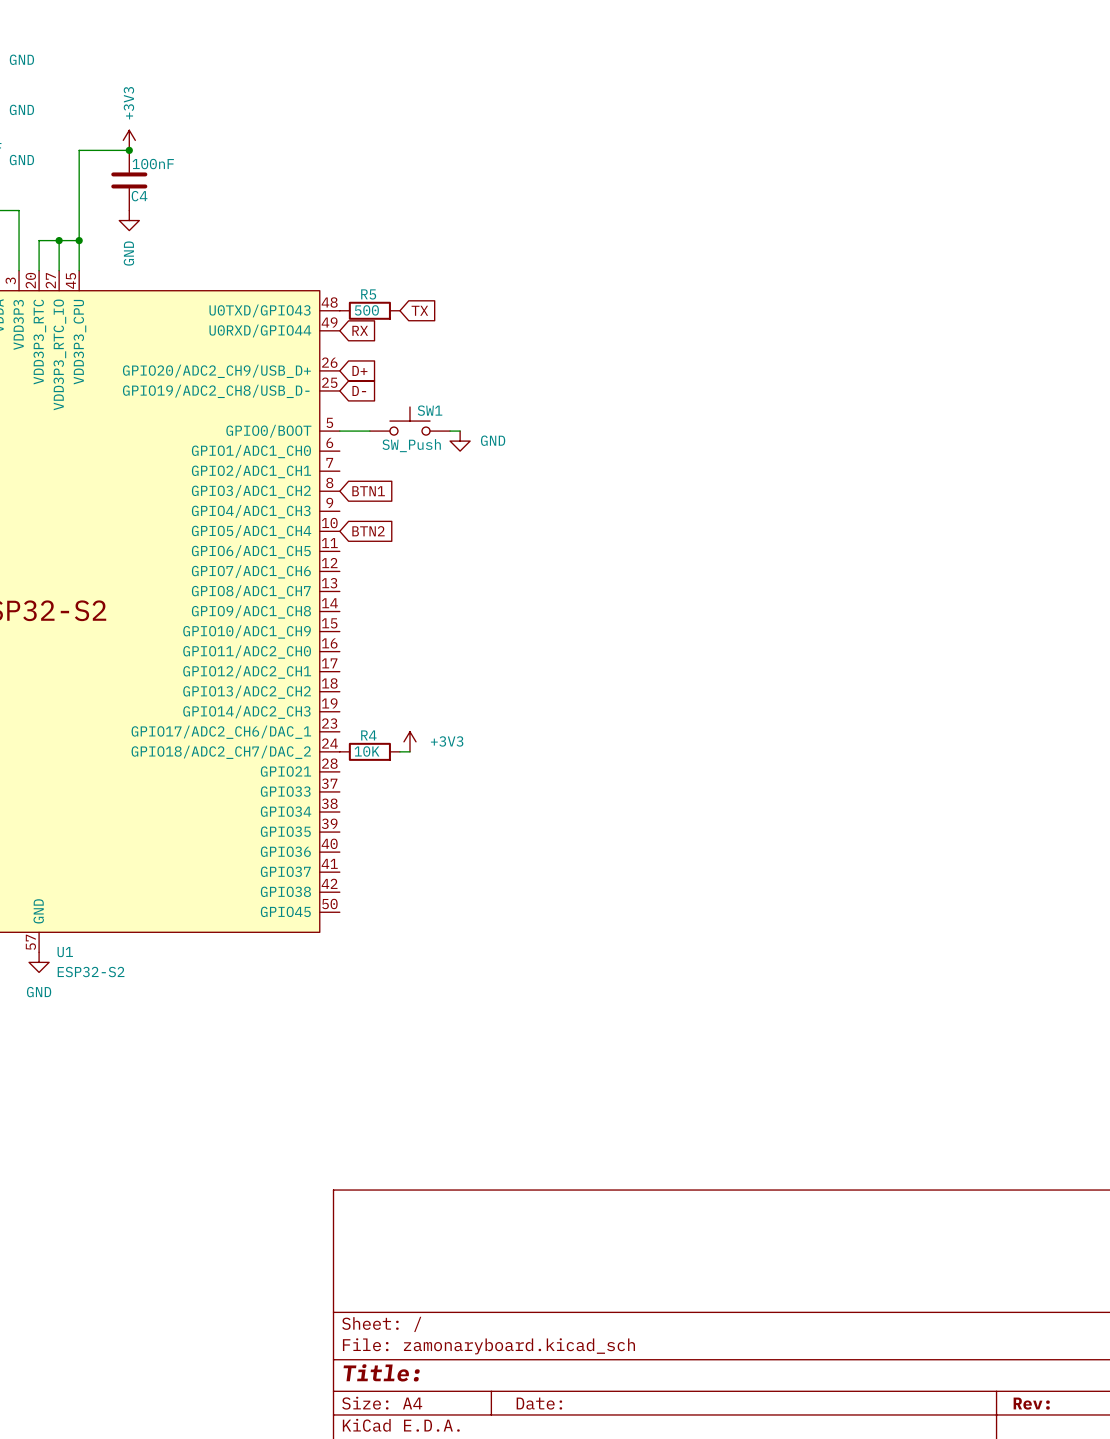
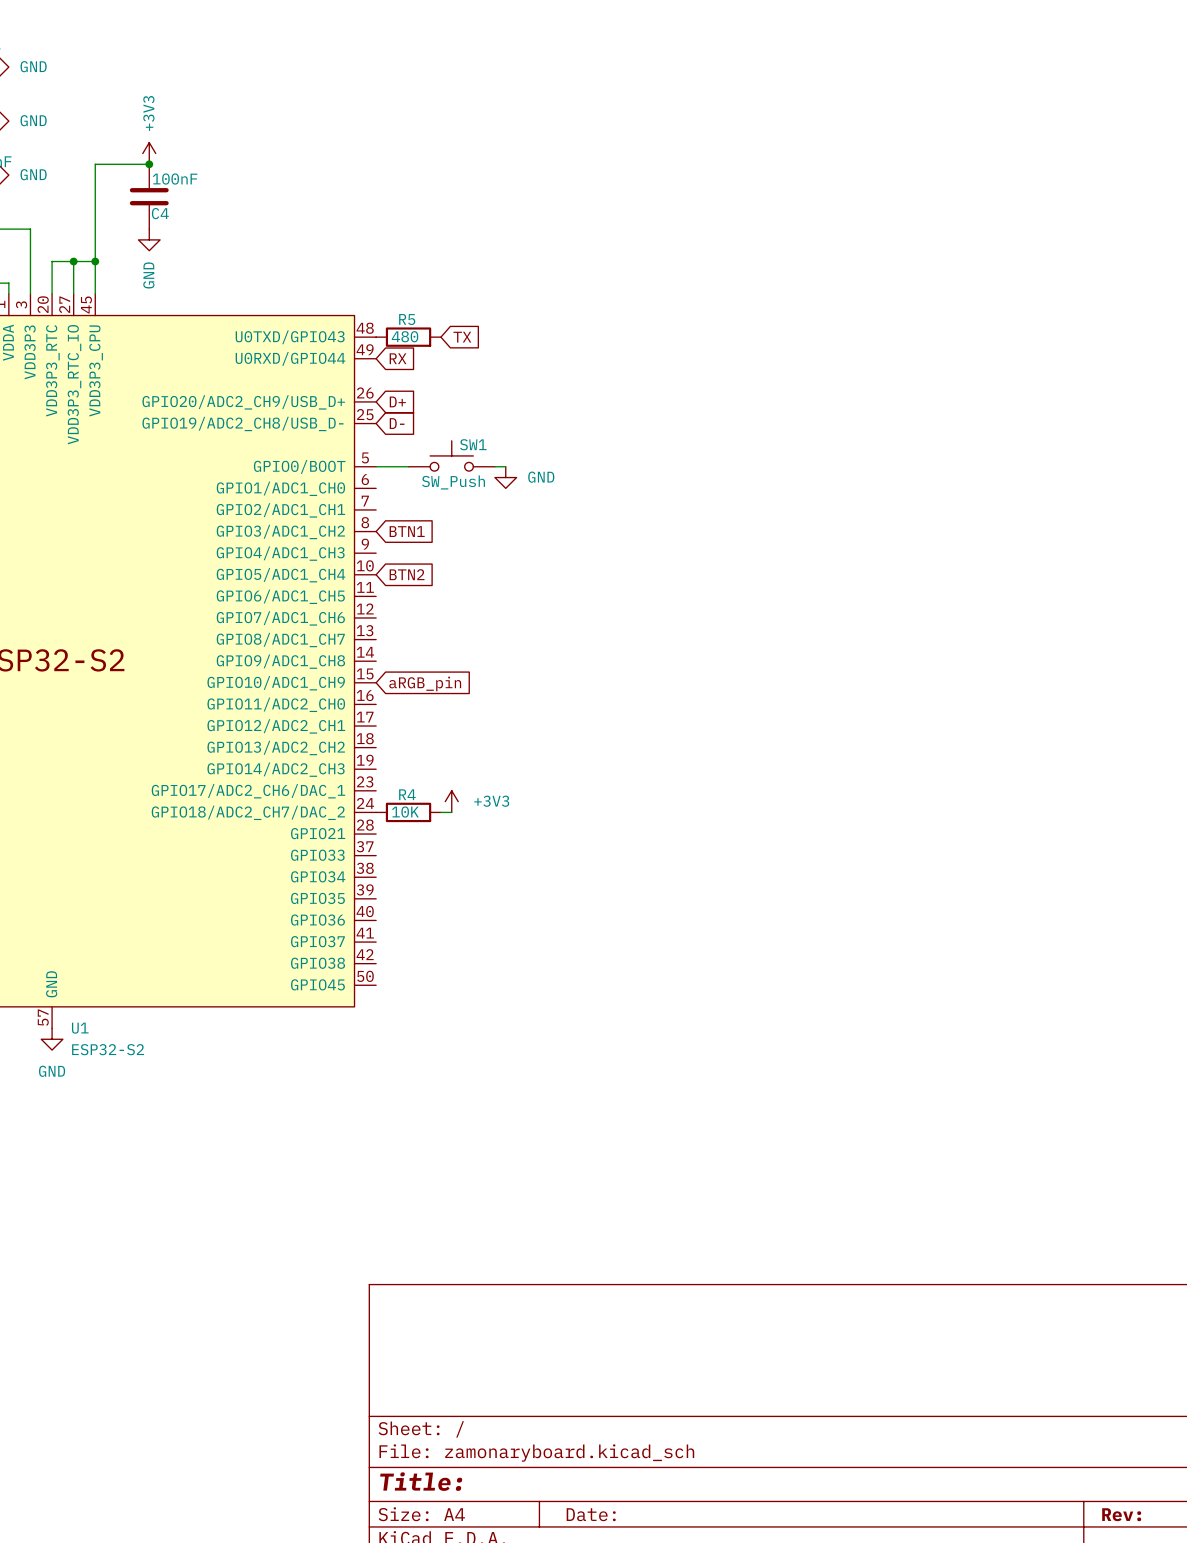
R5 value: 500 (366, 310) -> 480 (405, 336)
global label: none -> aRGB_pin (425, 683)

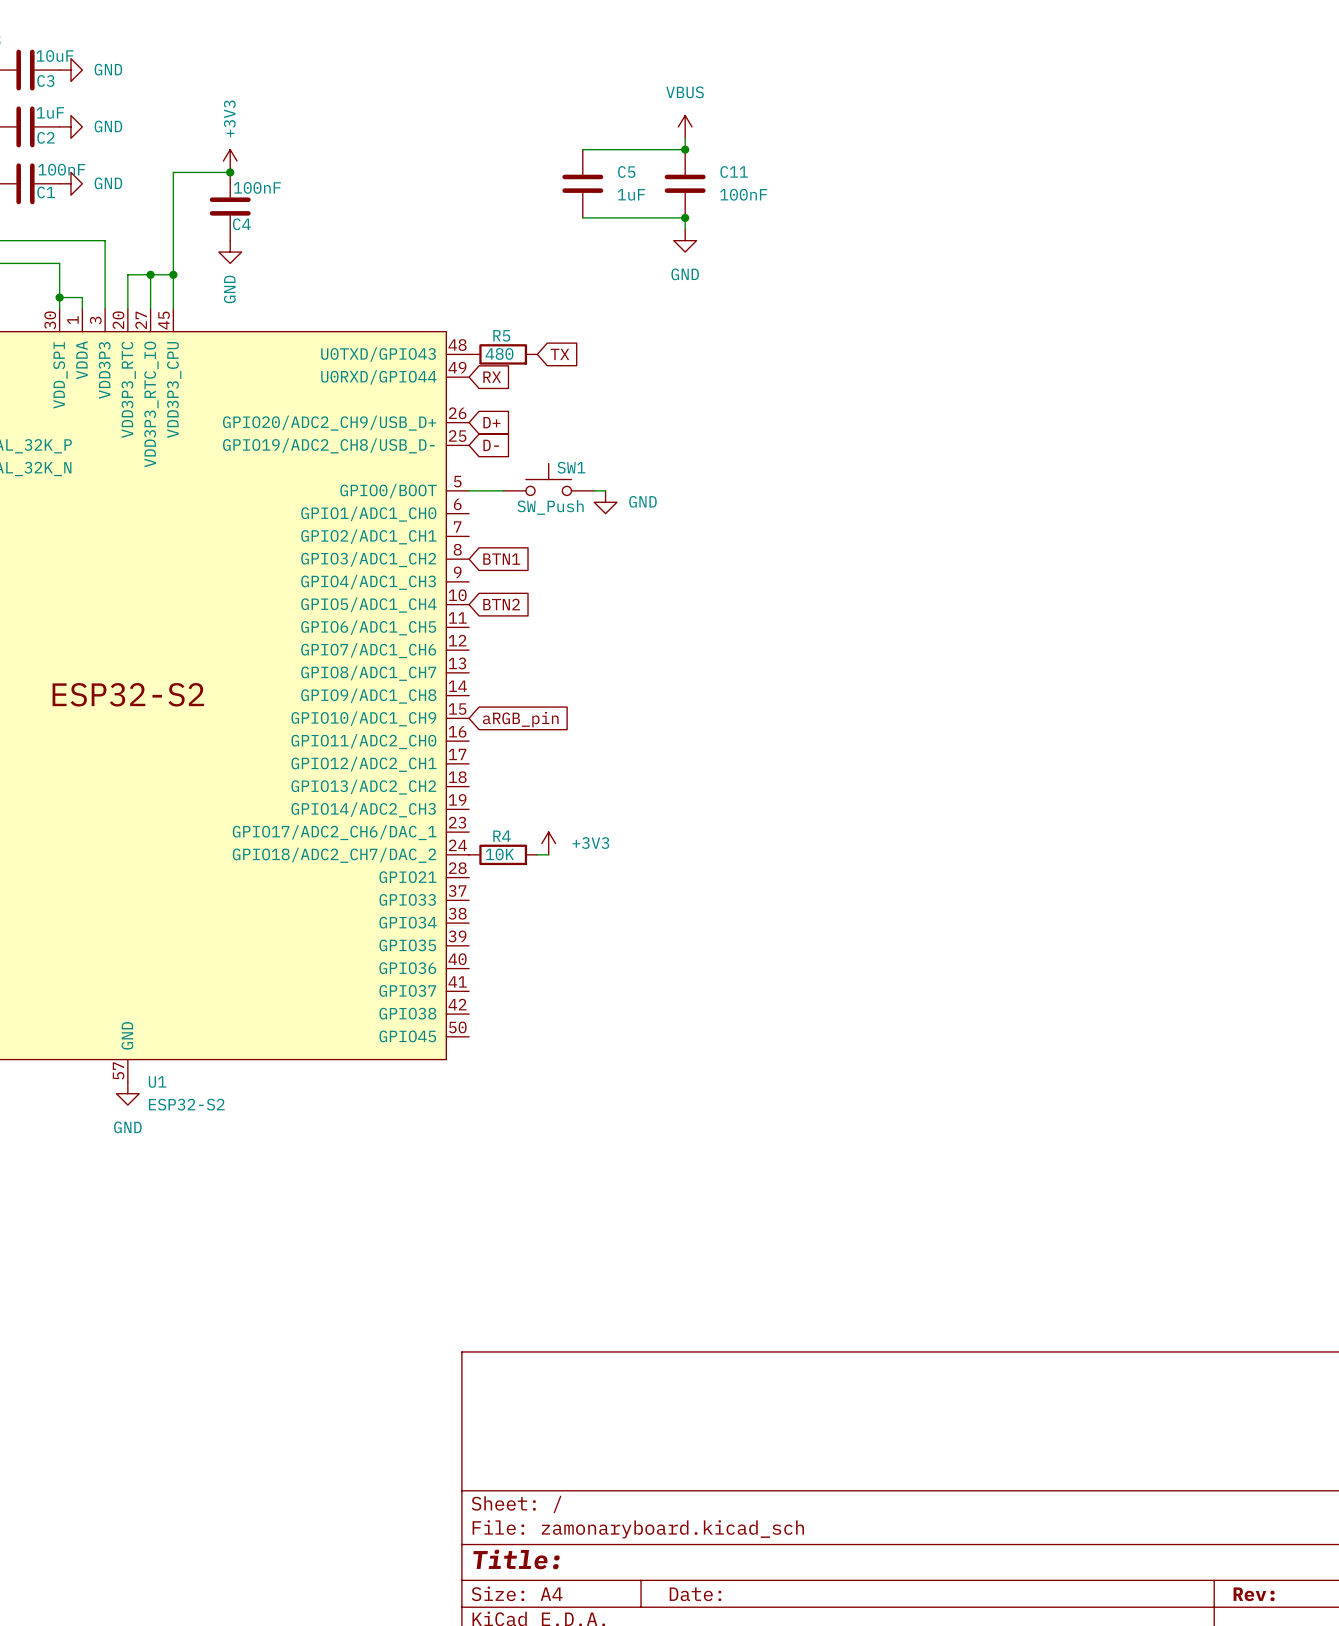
power symbol: none -> VBUS (685, 126)
wire: none -> (685, 138) (685, 149) (582, 149)
junction: none -> (685, 149)
C5: none -> 1uF (582, 183)
C11: none -> 100nF (685, 183)
wire: none -> (582, 217) (685, 217) (685, 229)
junction: none -> (685, 217)
power symbol: none -> GND (685, 240)

